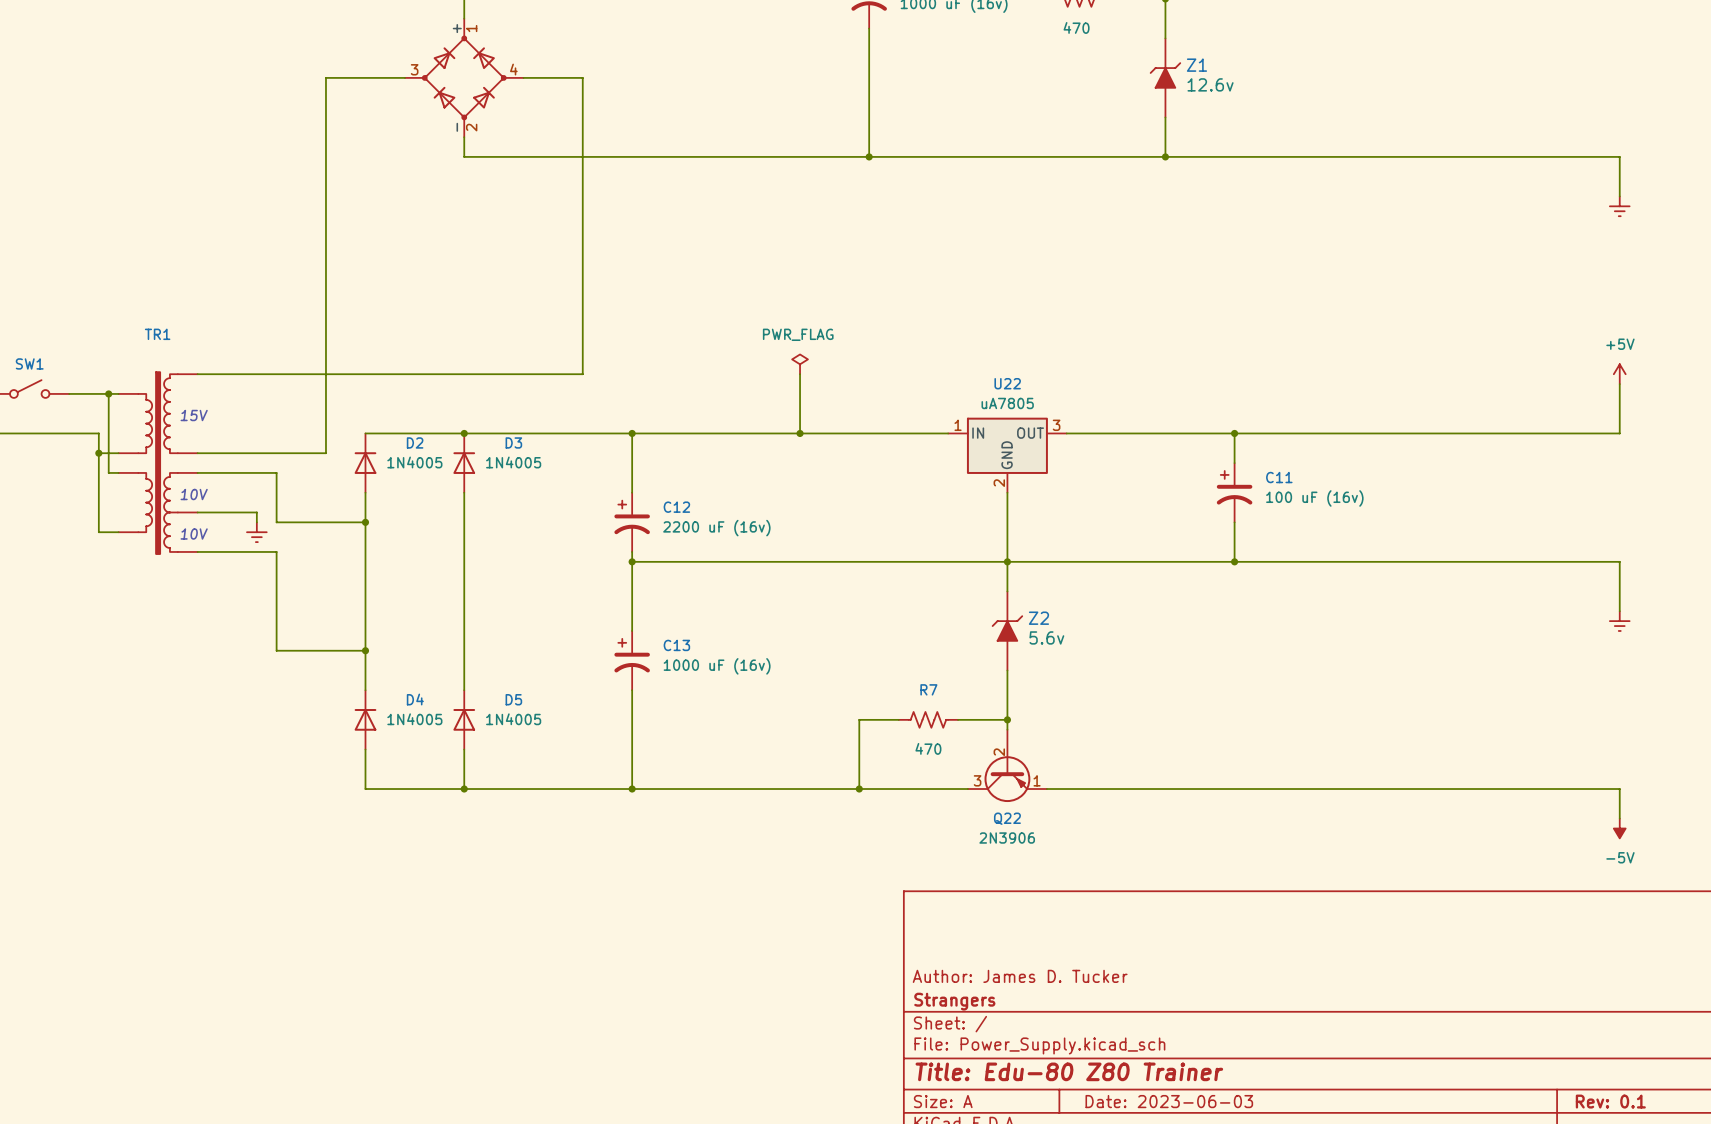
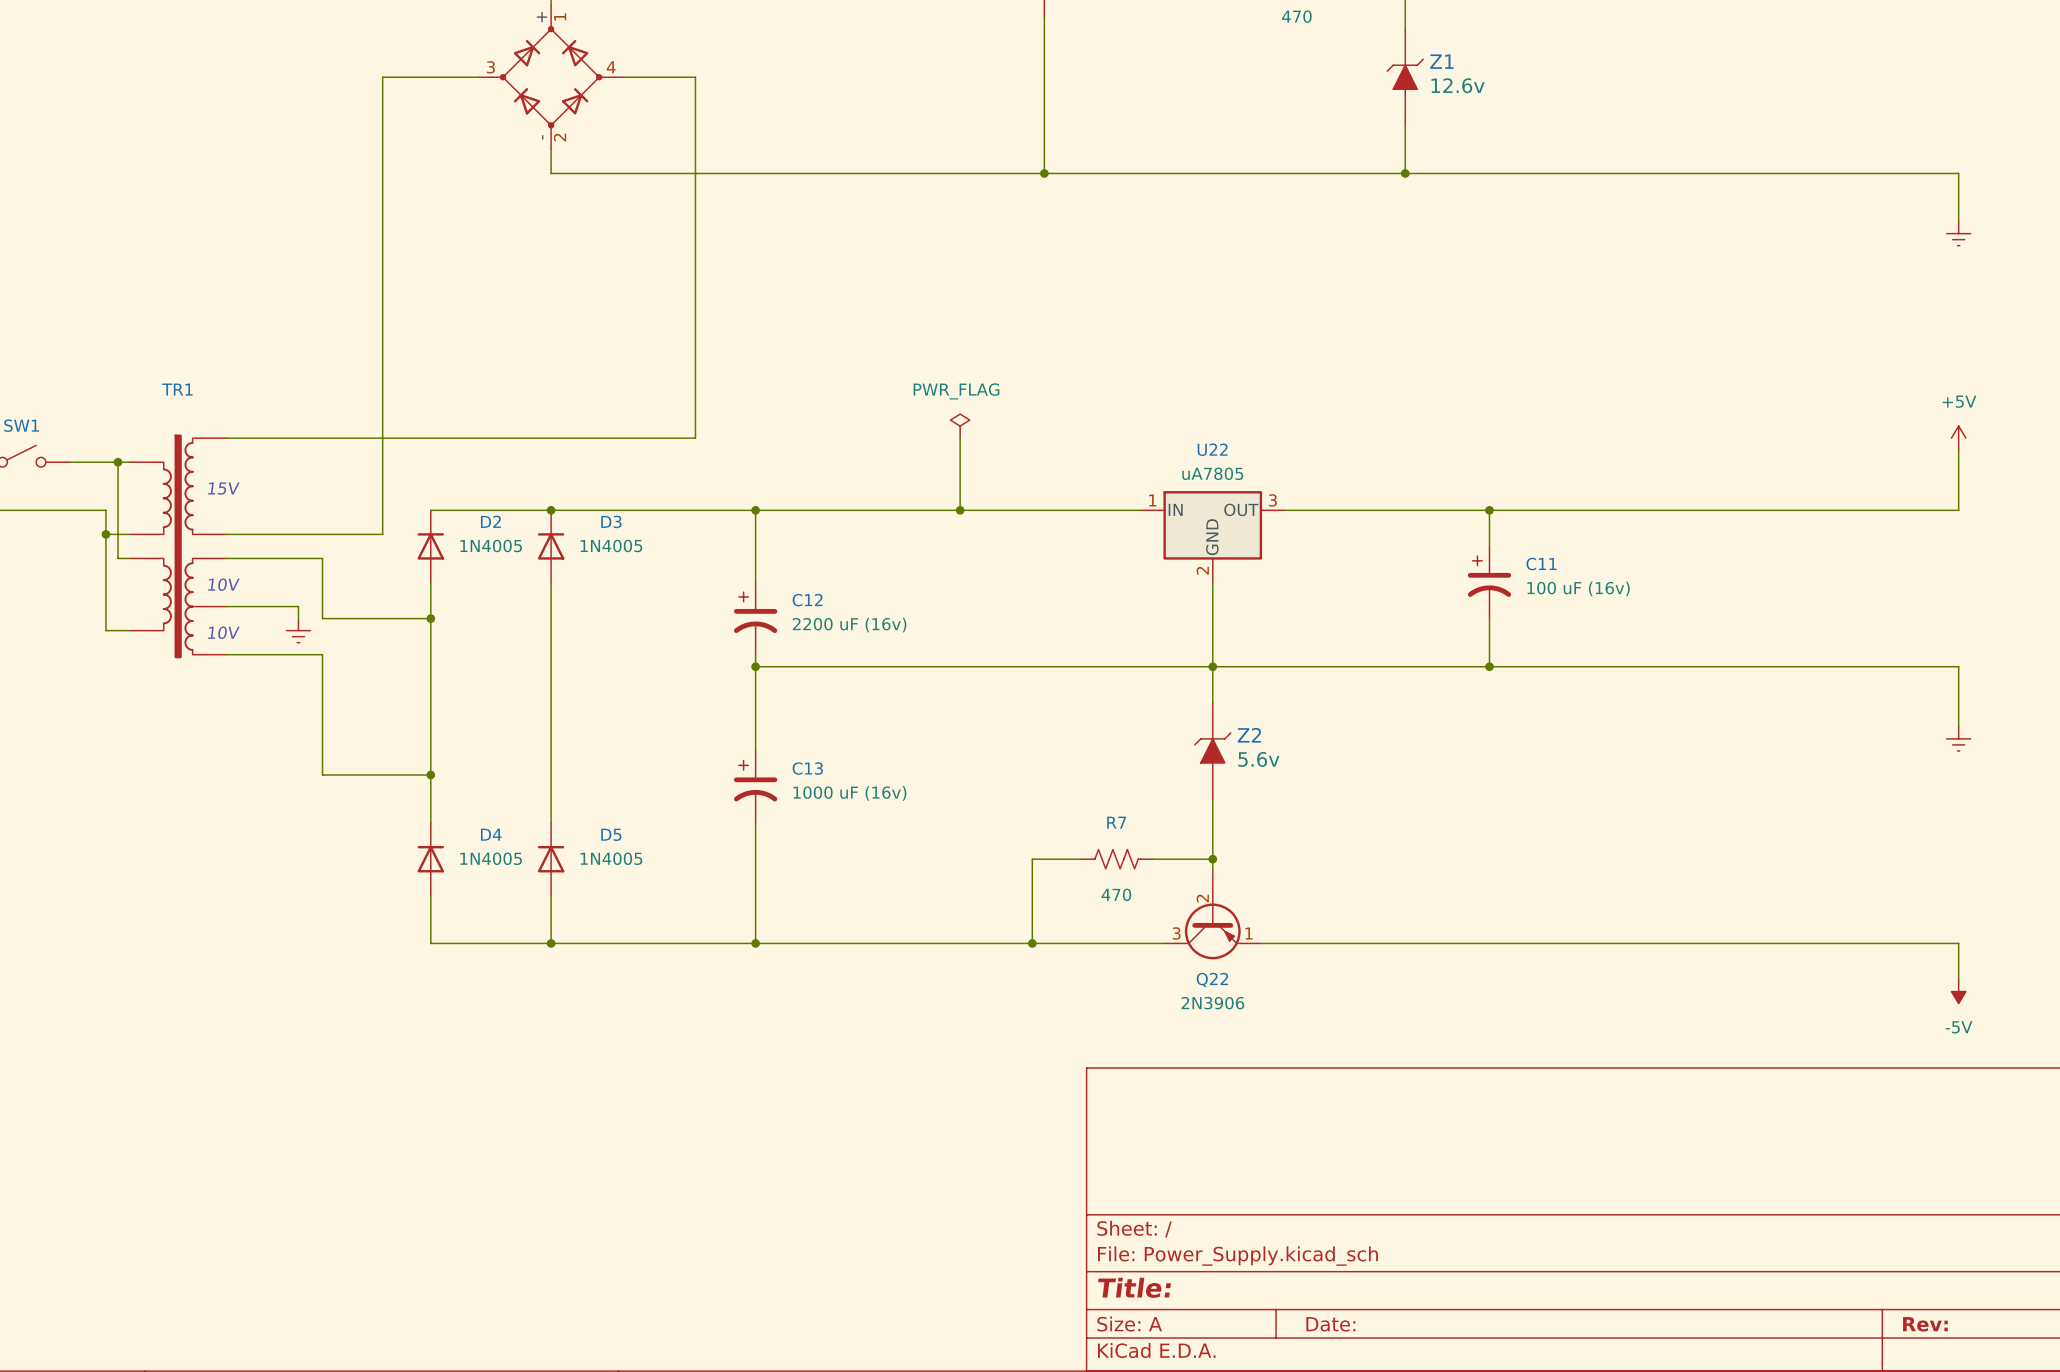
title block: Author: James D. Tucker (1020, 976) -> none
title block: Strangers (954, 1001) -> none
title block: Title: Edu-80 Z80 Trainer (1069, 1071) -> Title: (1134, 1287)
title block: Date: 2023-06-03 (1169, 1101) -> Date: (1330, 1324)
title block: Rev: 0.1 (1610, 1101) -> Rev: (1925, 1324)

